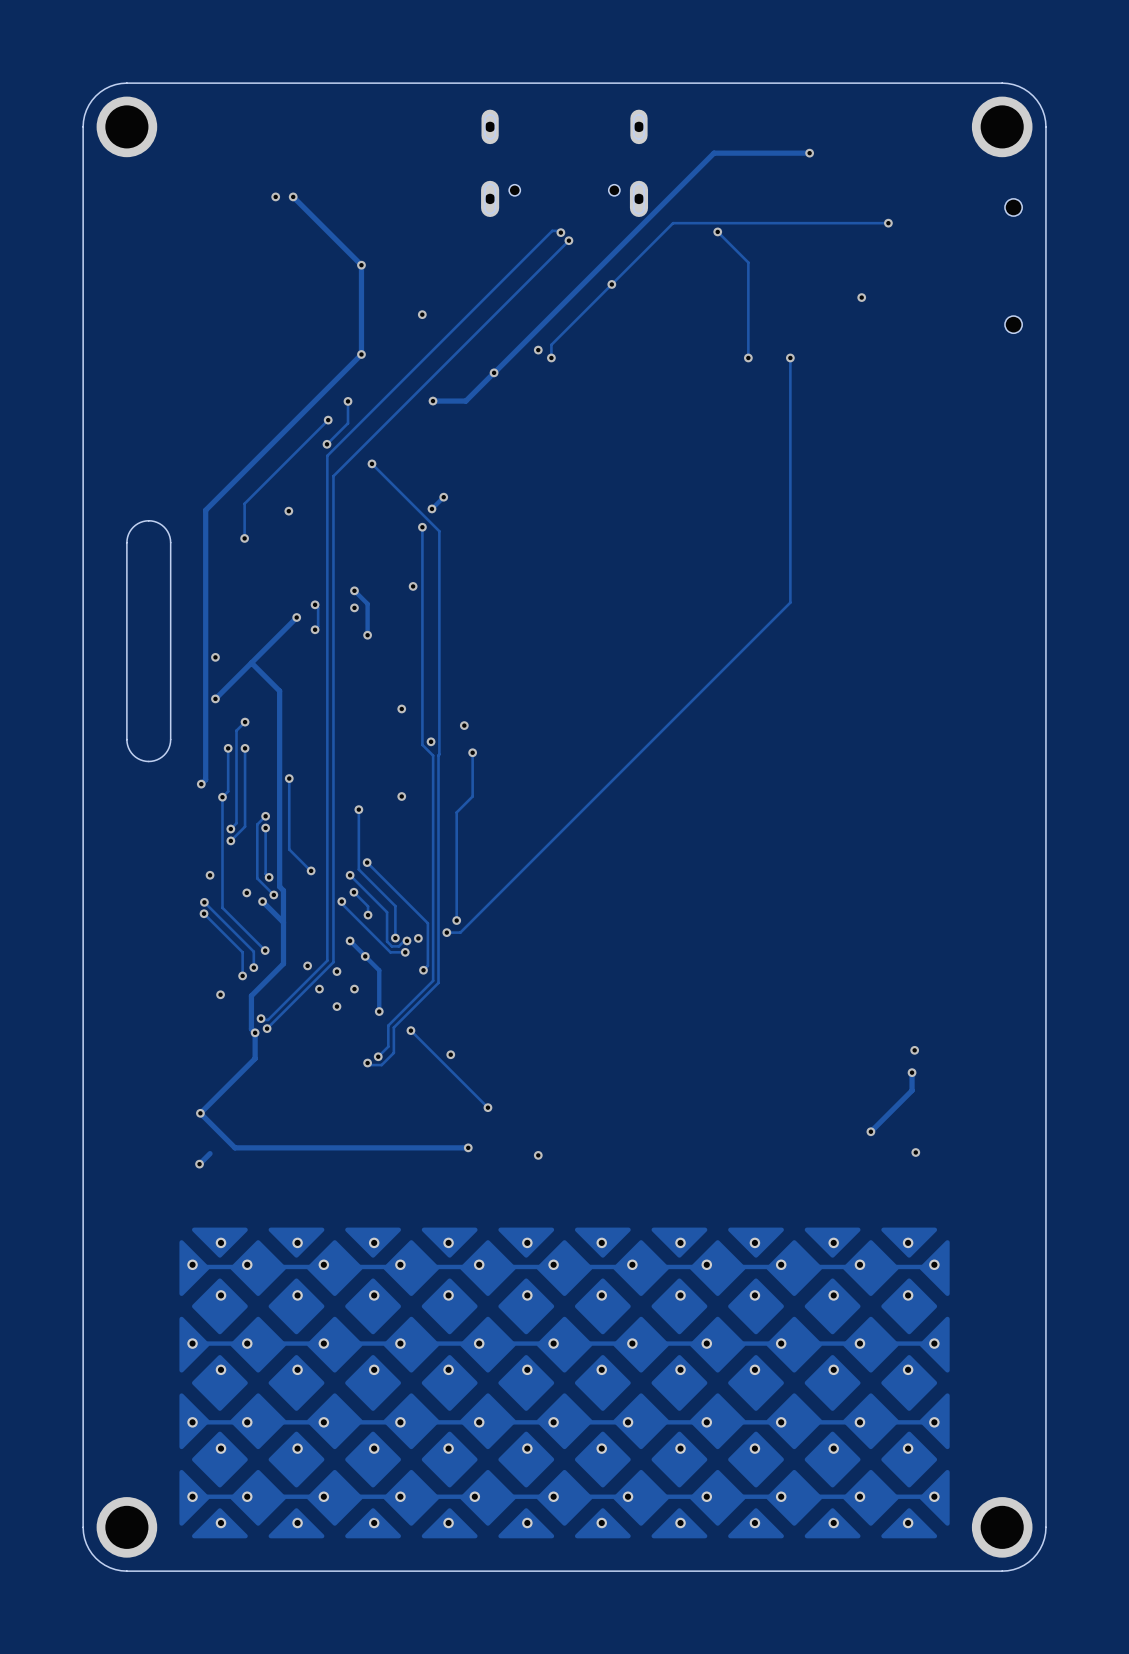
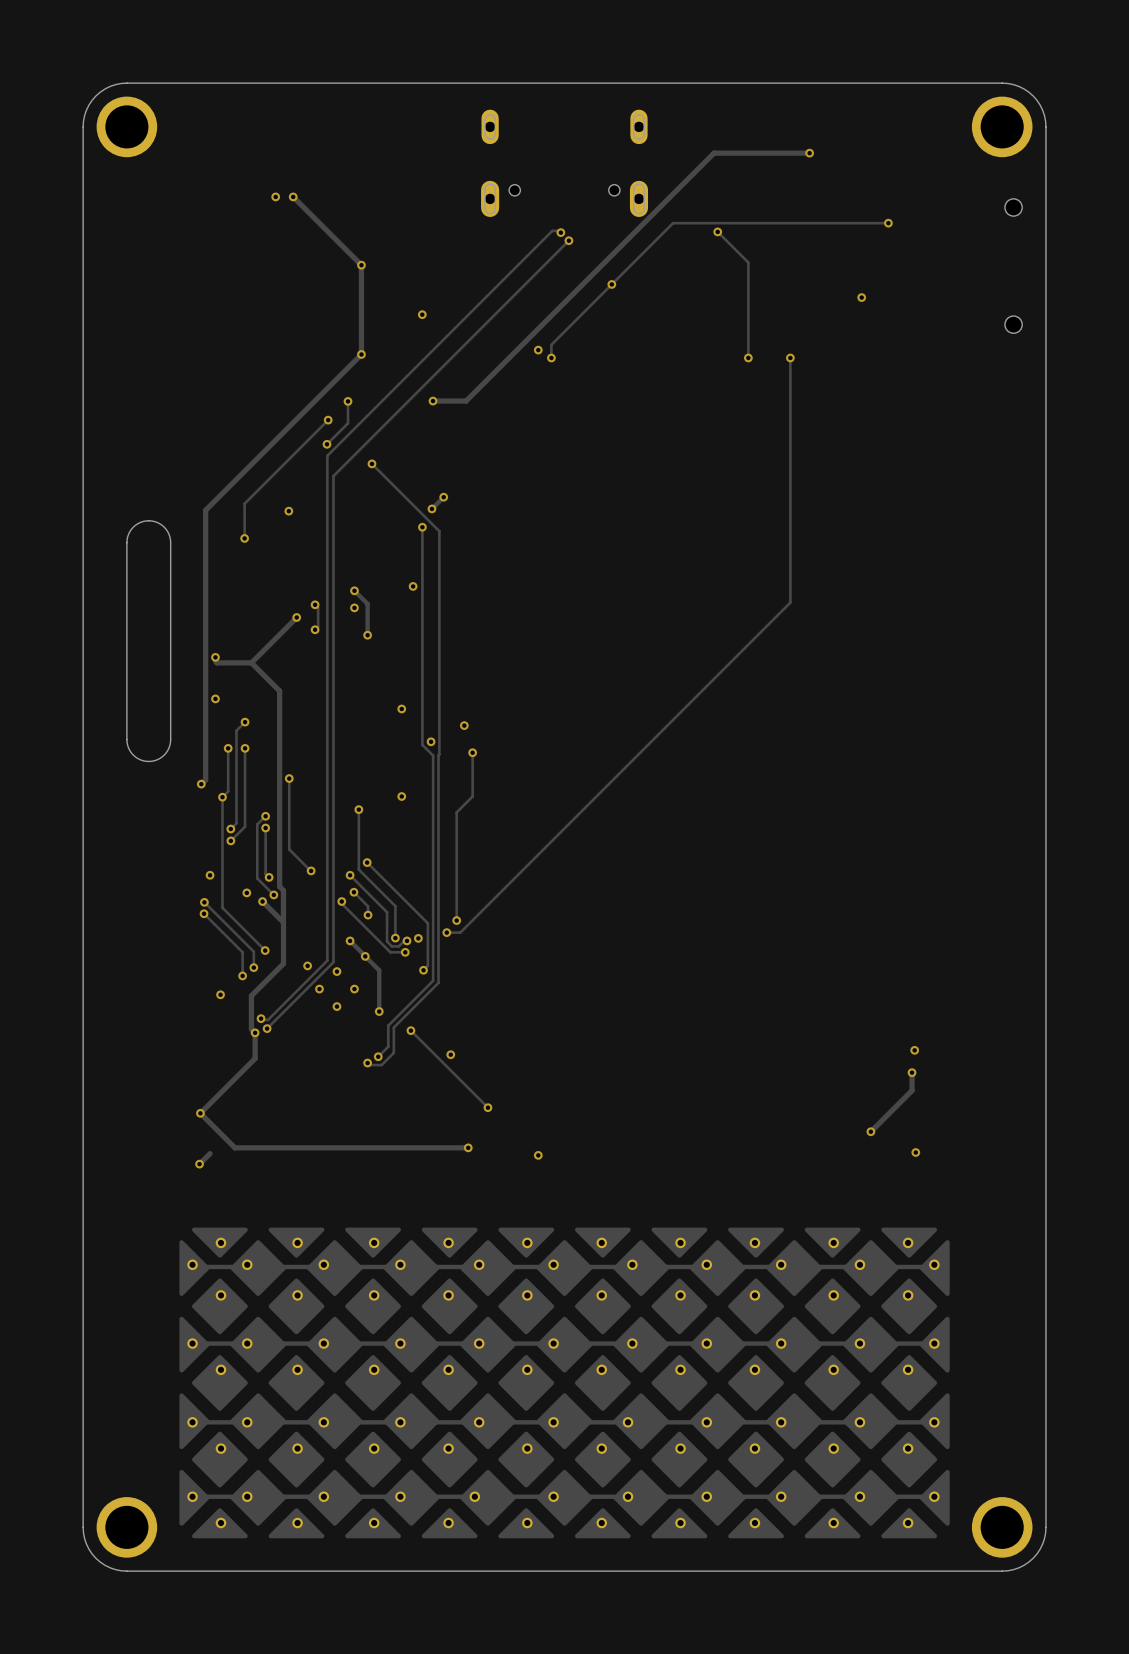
via: (494, 372) -> none
track: (251, 662) (215, 698) -> (251, 662) (215, 661)

